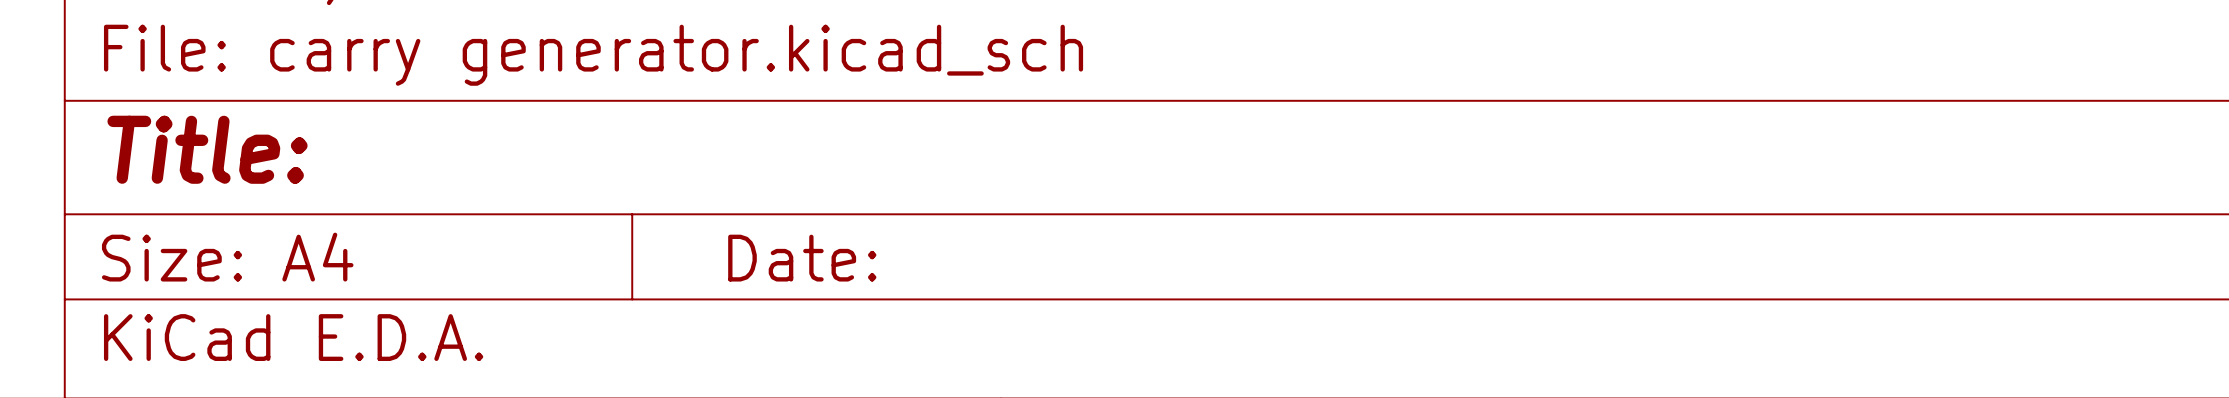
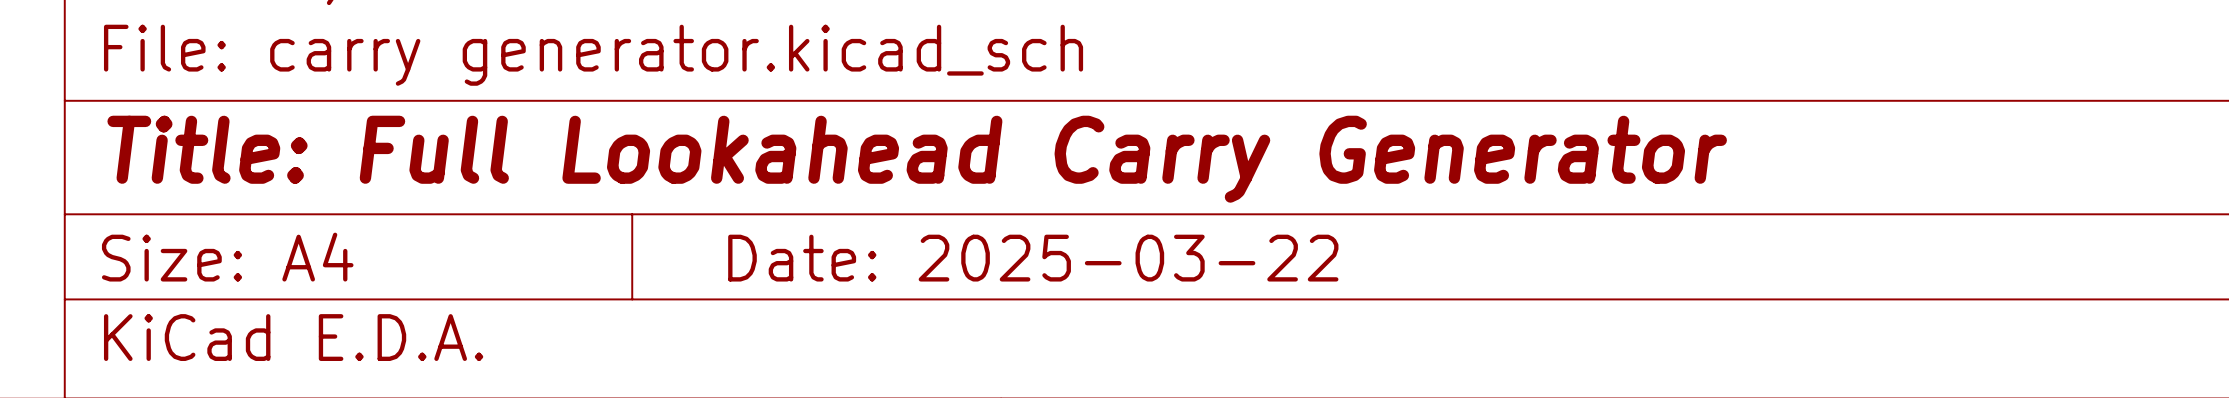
title block: Title: (207, 149) -> Title: Full Lookahead Carry Generator (917, 159)
title block: Date: (802, 258) -> Date: 2025-03-22 (1033, 258)

